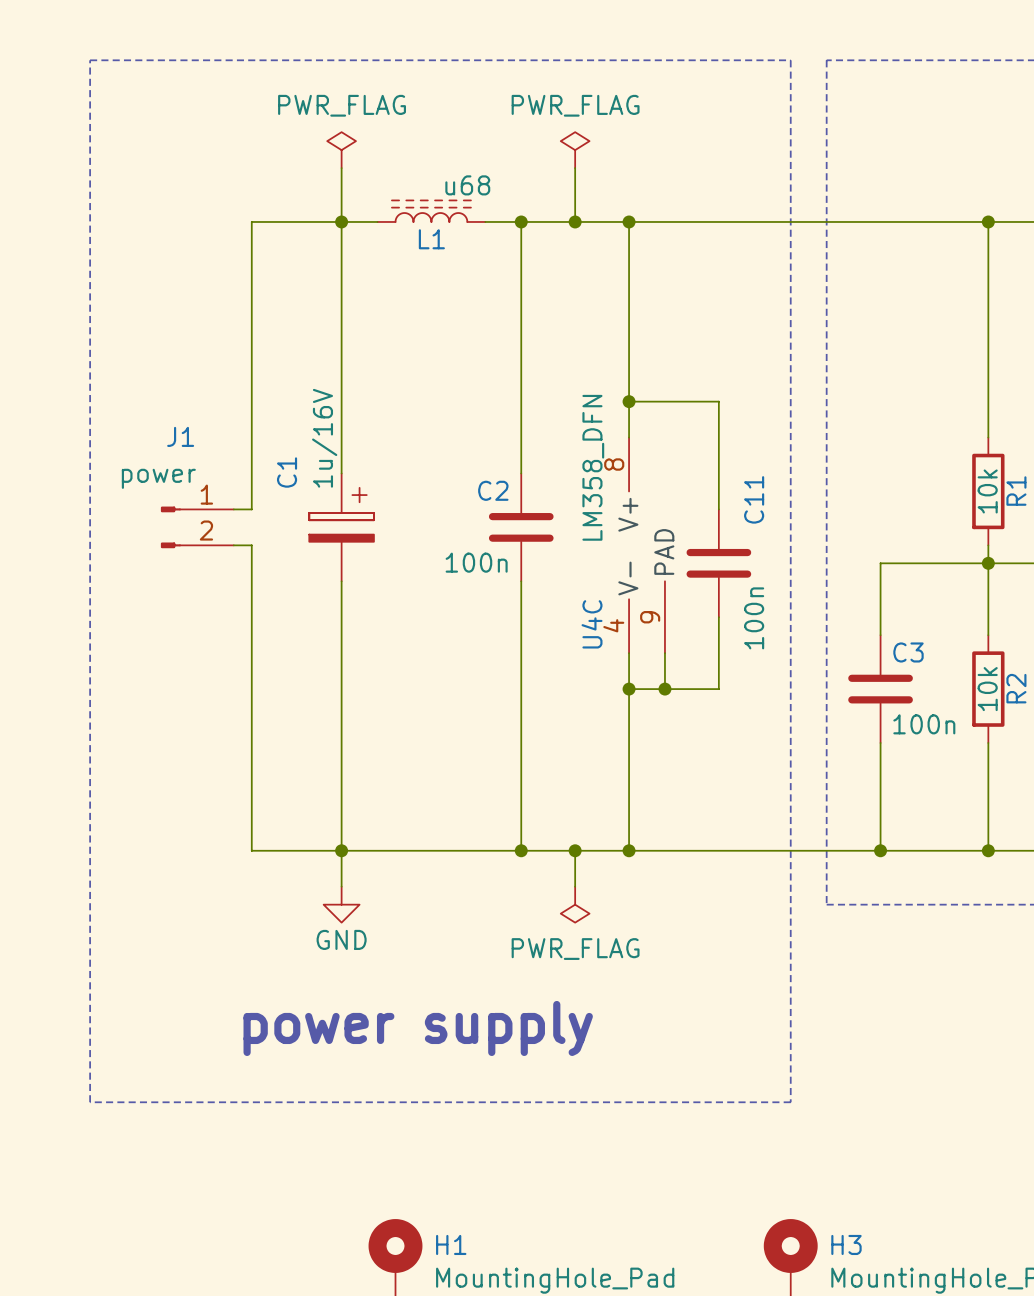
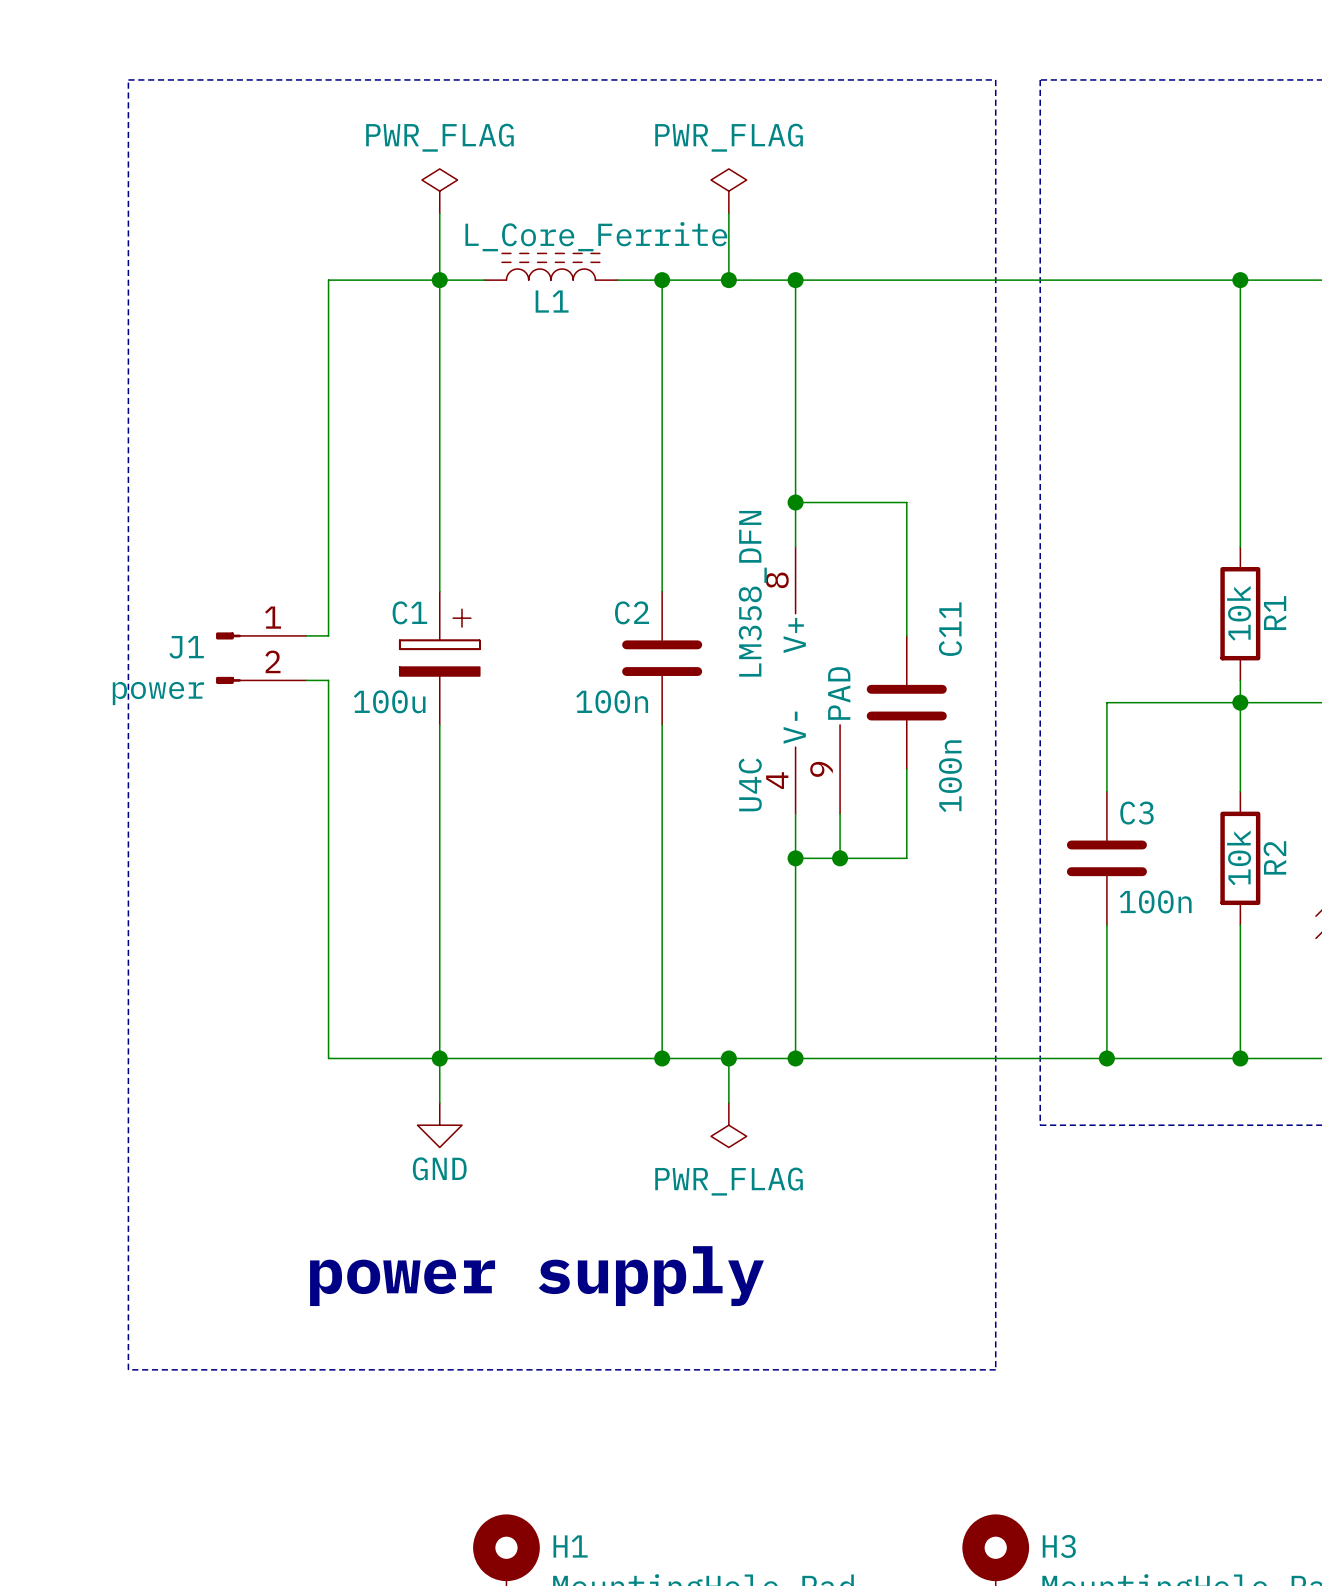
L1 value: u68 (467, 185) -> L_Core_Ferrite (596, 236)
J1 name position: J1 (180, 436) -> J1 (186, 647)
C1 value: 1u/16V (324, 438) -> 100u (389, 701)
C1 name rotation: 0° (287, 472) -> 90° clockwise (409, 612)
J1 value position: power (158, 478) -> power (158, 693)

